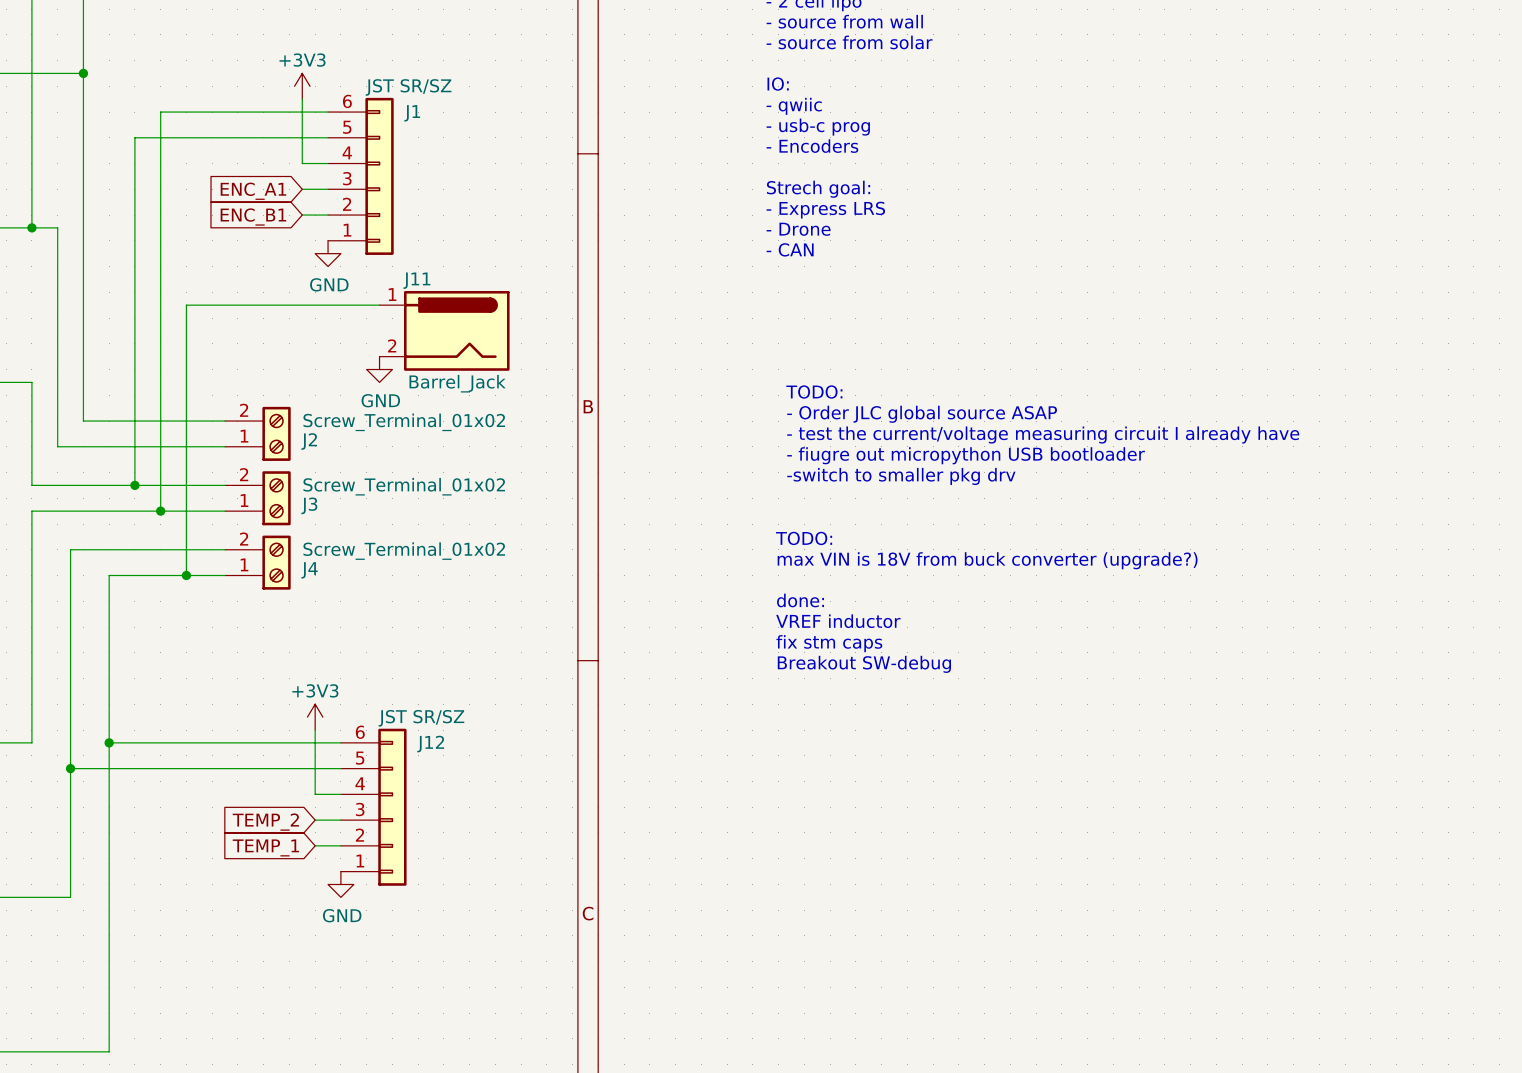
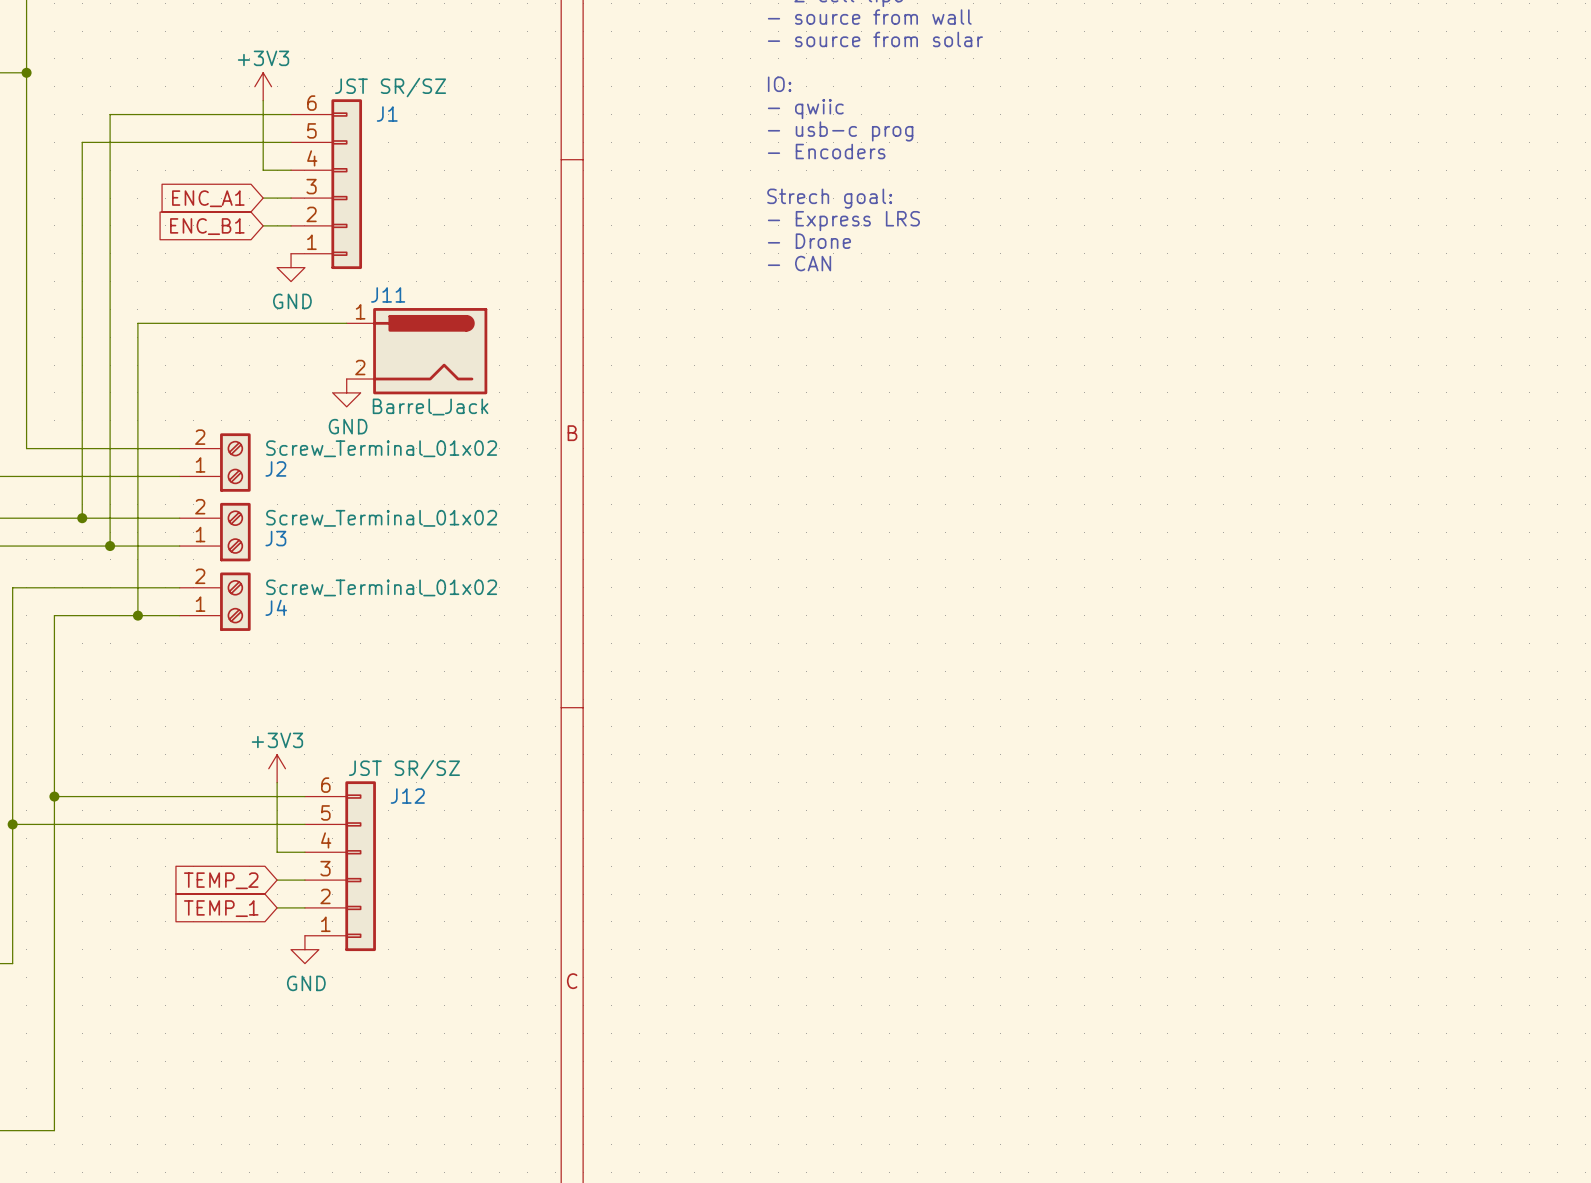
text: TODO: (814, 392) -> none
text: - Order JLC global source ASAP (922, 414) -> none
text: - test the current/voltage measuring circuit I already have (1043, 435) -> none
text: - fiugre out micropython USB bootloader (966, 455) -> none
text: -switch to smaller pkg drv (901, 476) -> none
text: TODO: (804, 538) -> none
text: max VIN is 18V from buck converter (upgrade?) (987, 560) -> none
text: done: (800, 600) -> none
text: VREF inductor (838, 621) -> none
text: fix stm caps (829, 643) -> none
text: Breakout SW-debug (864, 664) -> none

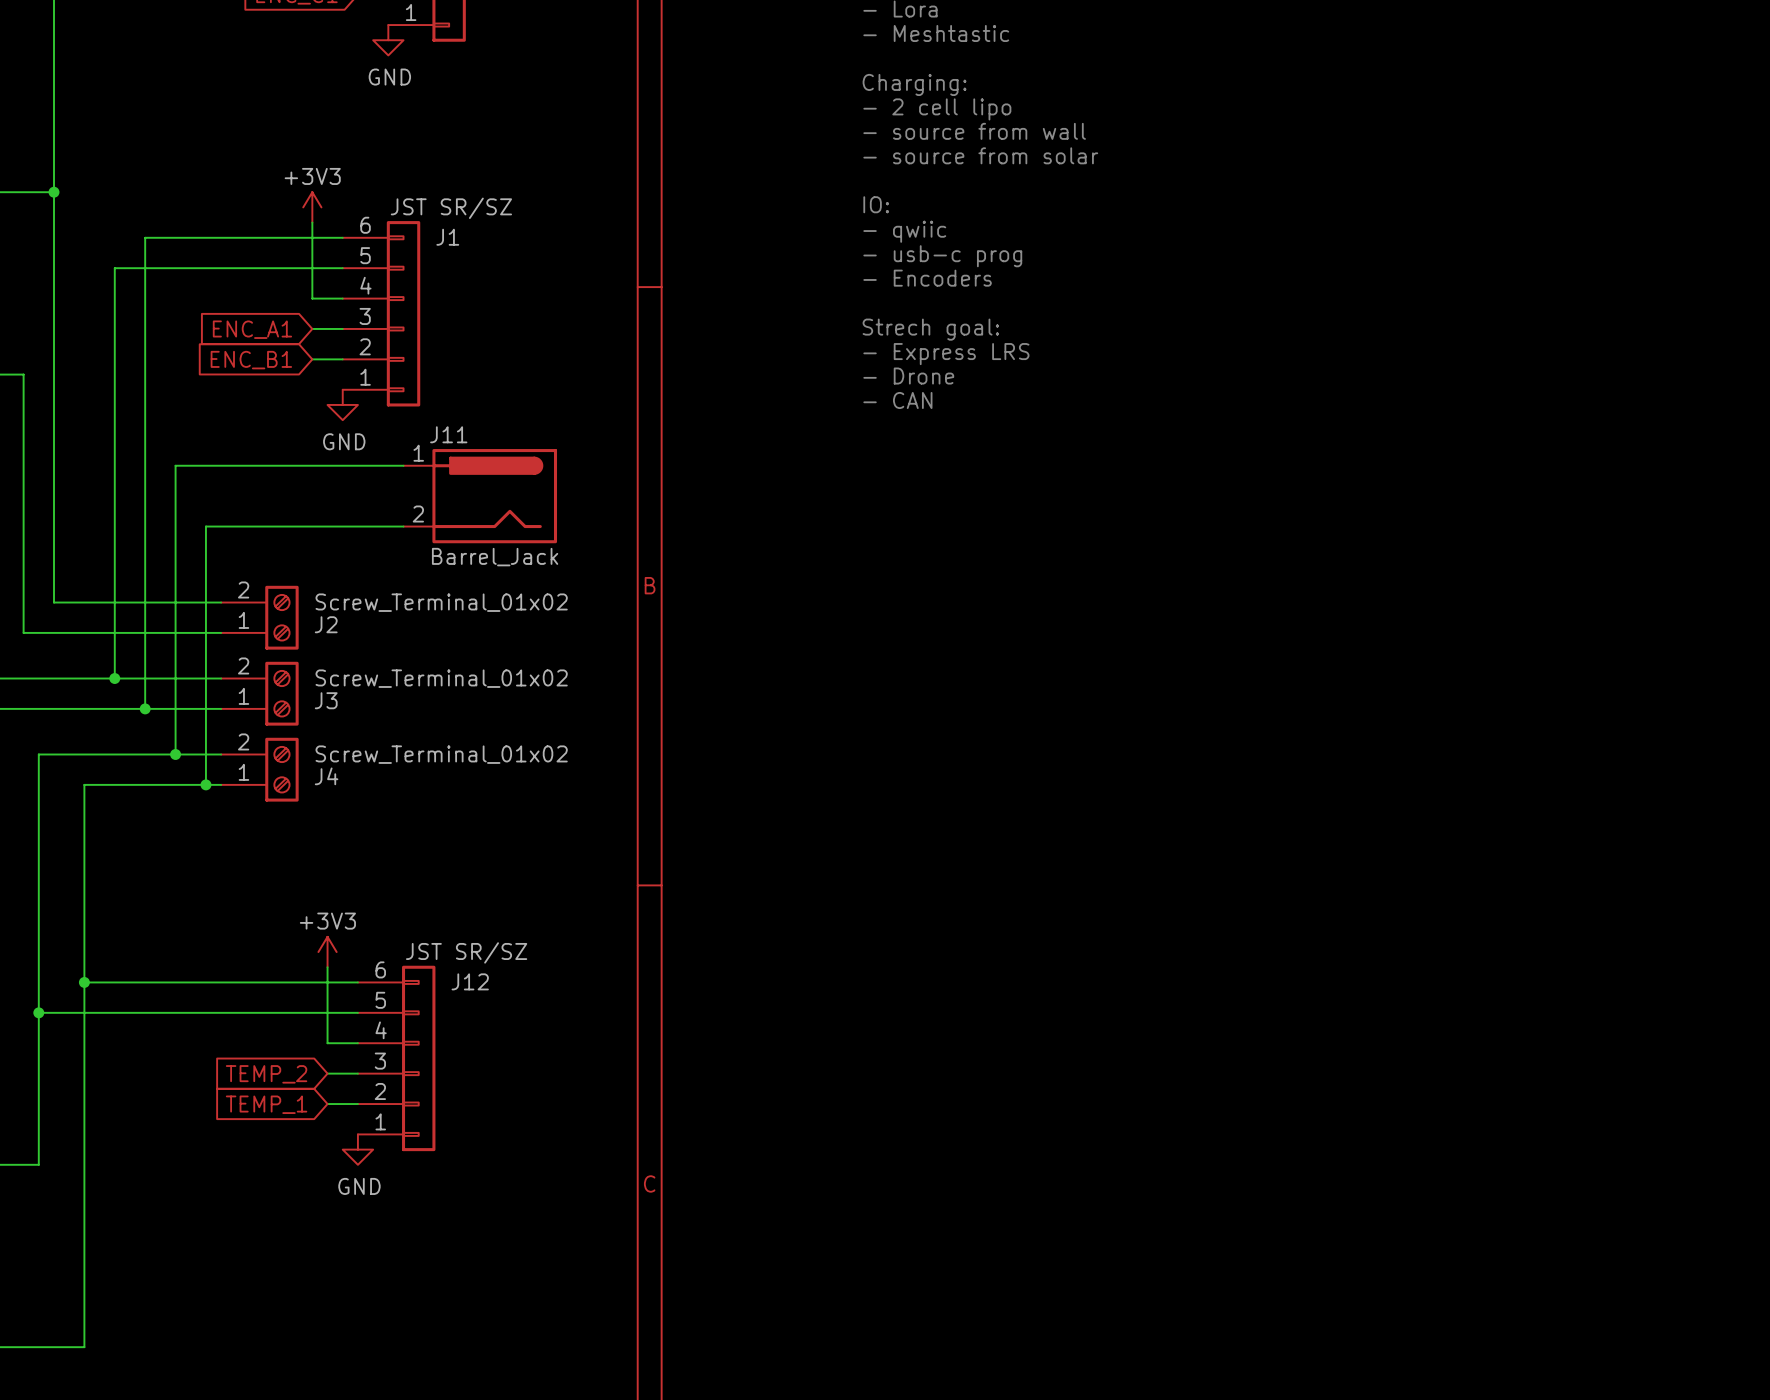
wire: none -> (403, 526) (205, 526) (205, 784)
power symbol: GND (346, 392) -> none
wire: (137, 587) (137, 615) -> none
junction: none -> (175, 754)
junction: (137, 615) -> none
junction: none -> (205, 784)

